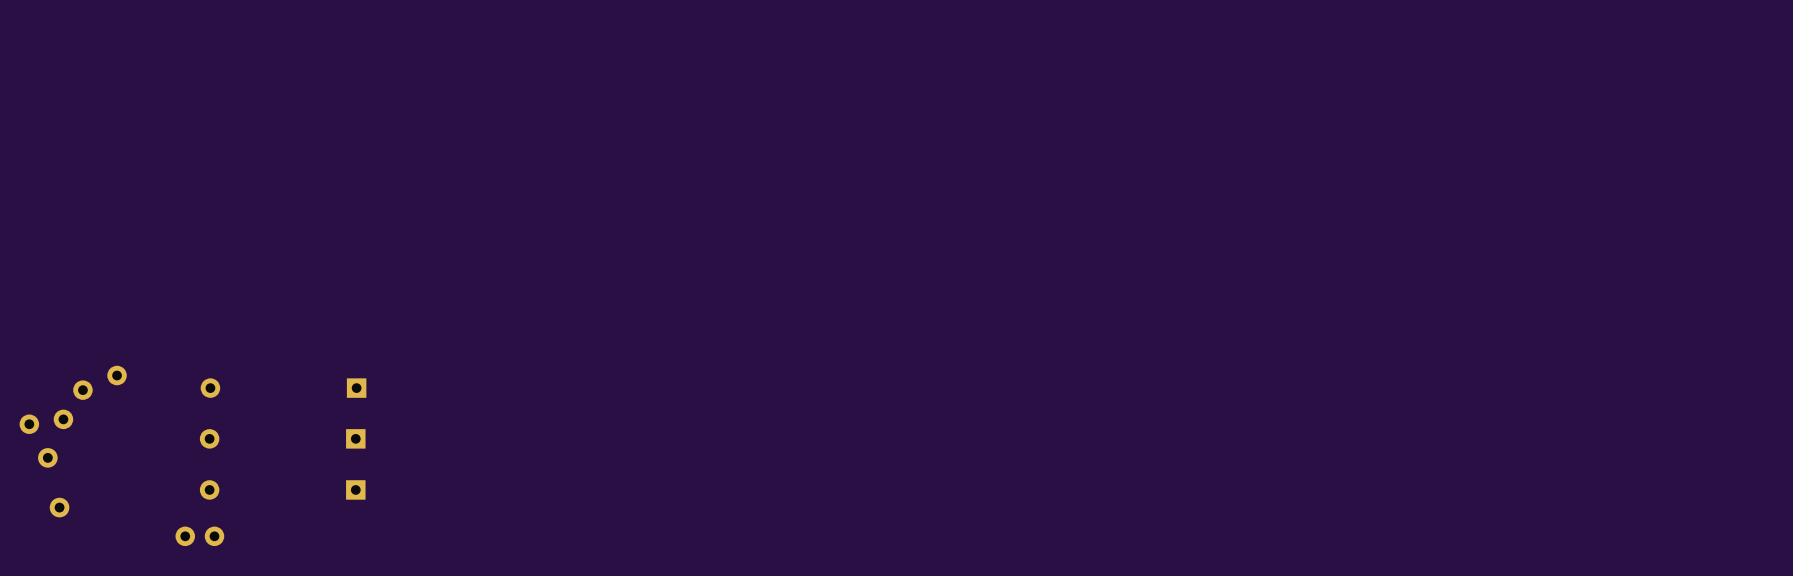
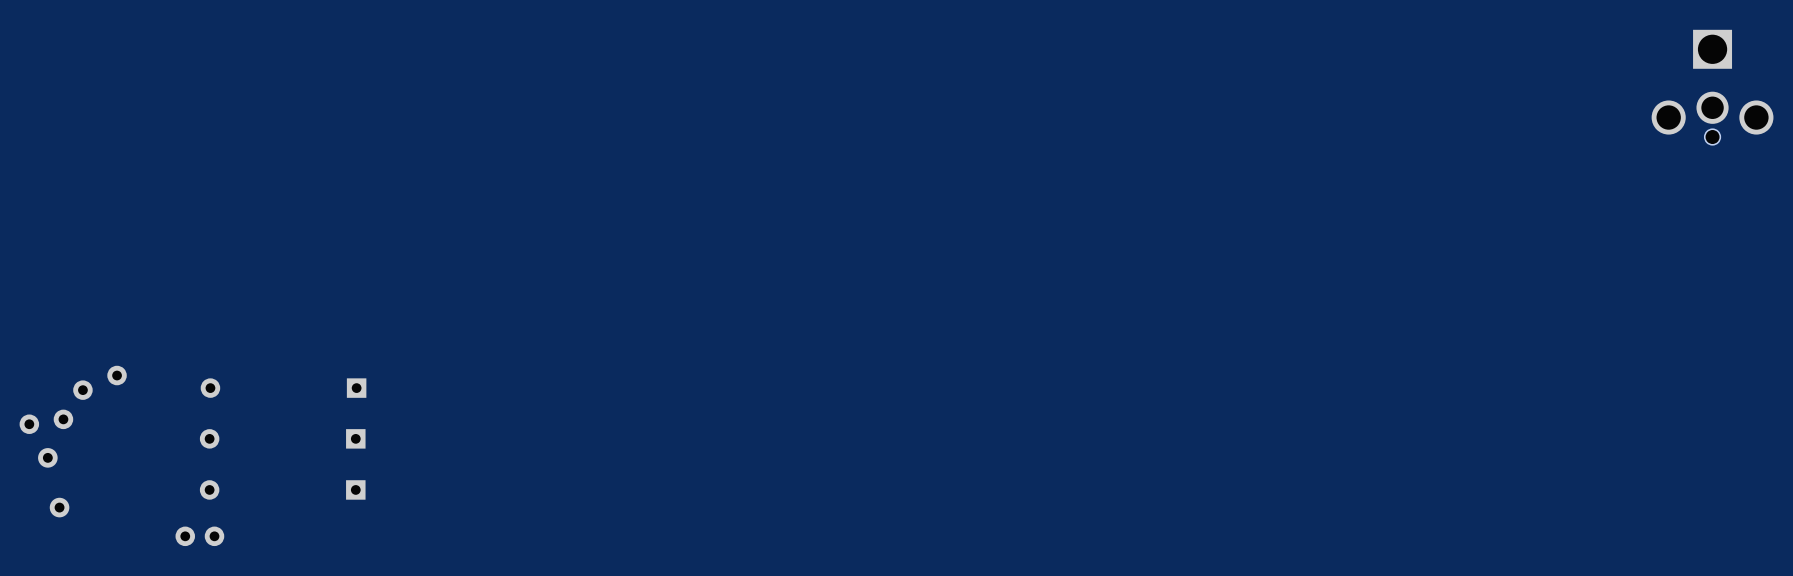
part: none -> (1712, 87)

